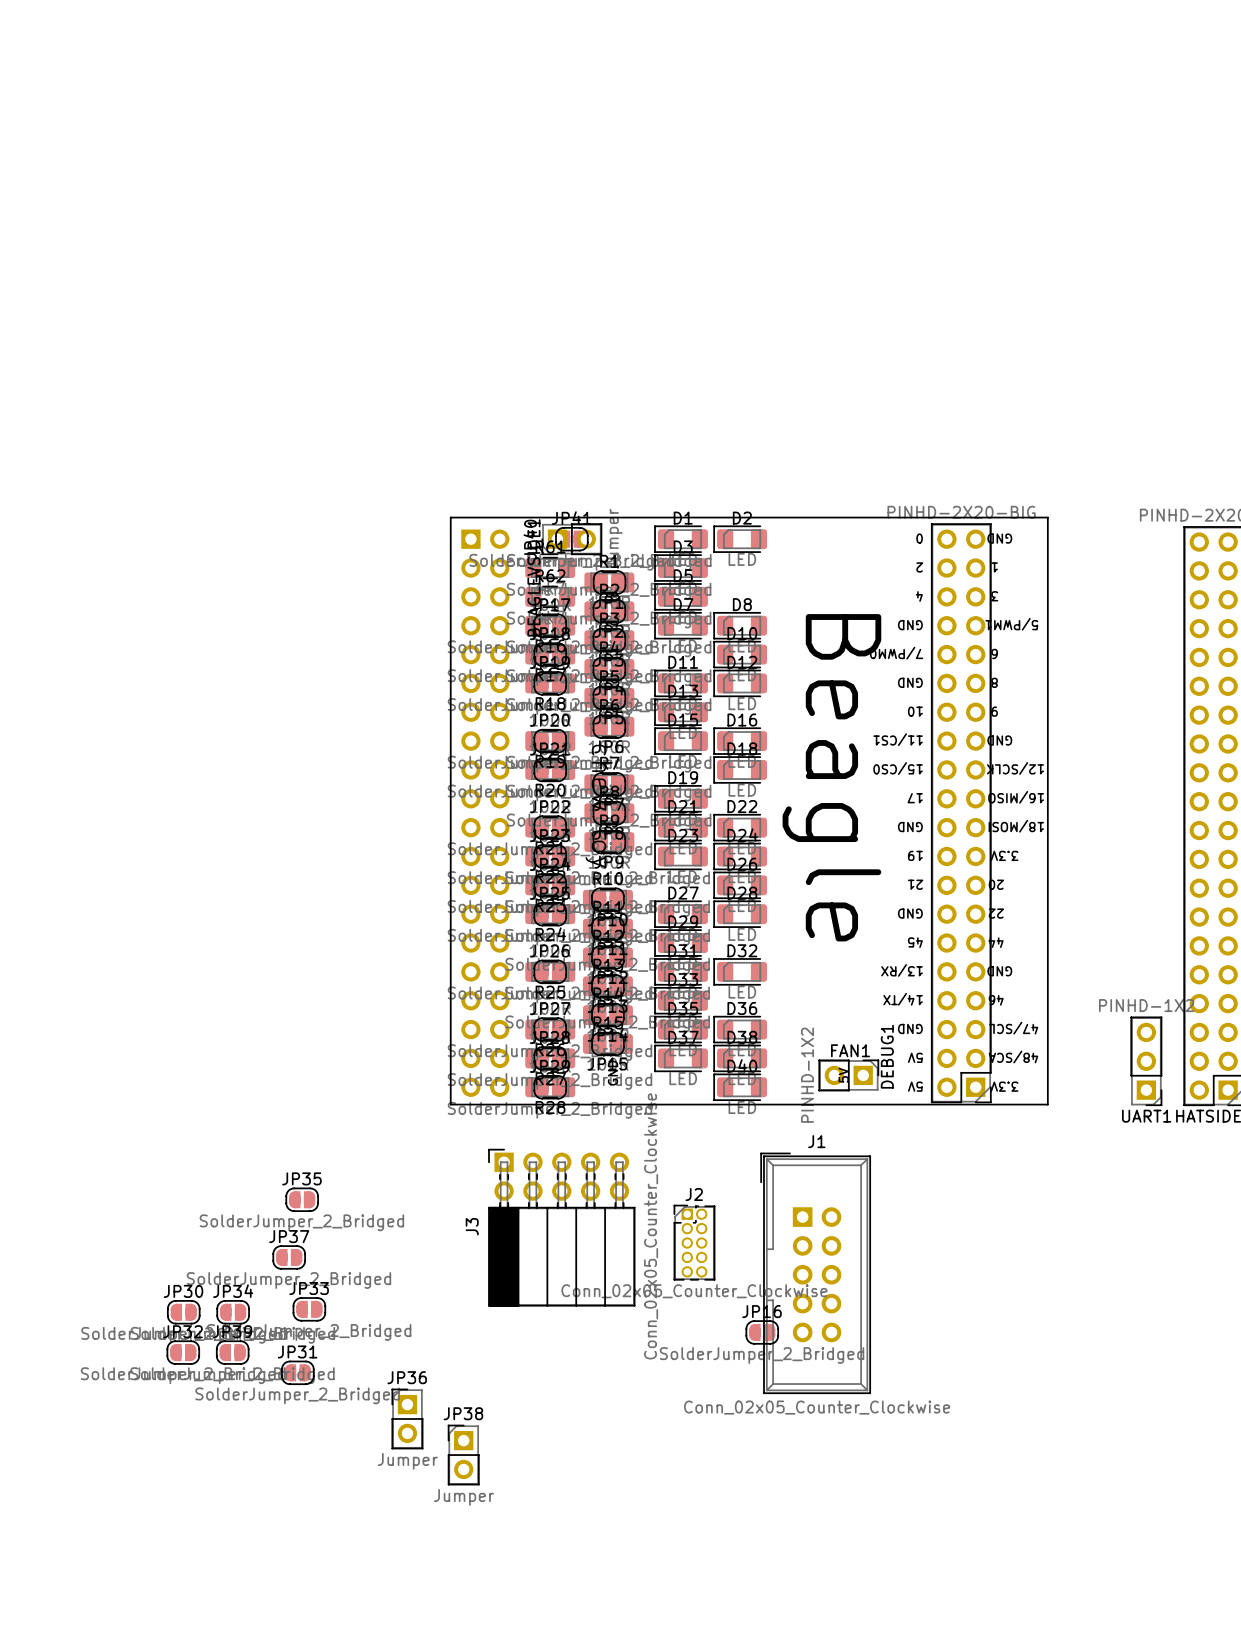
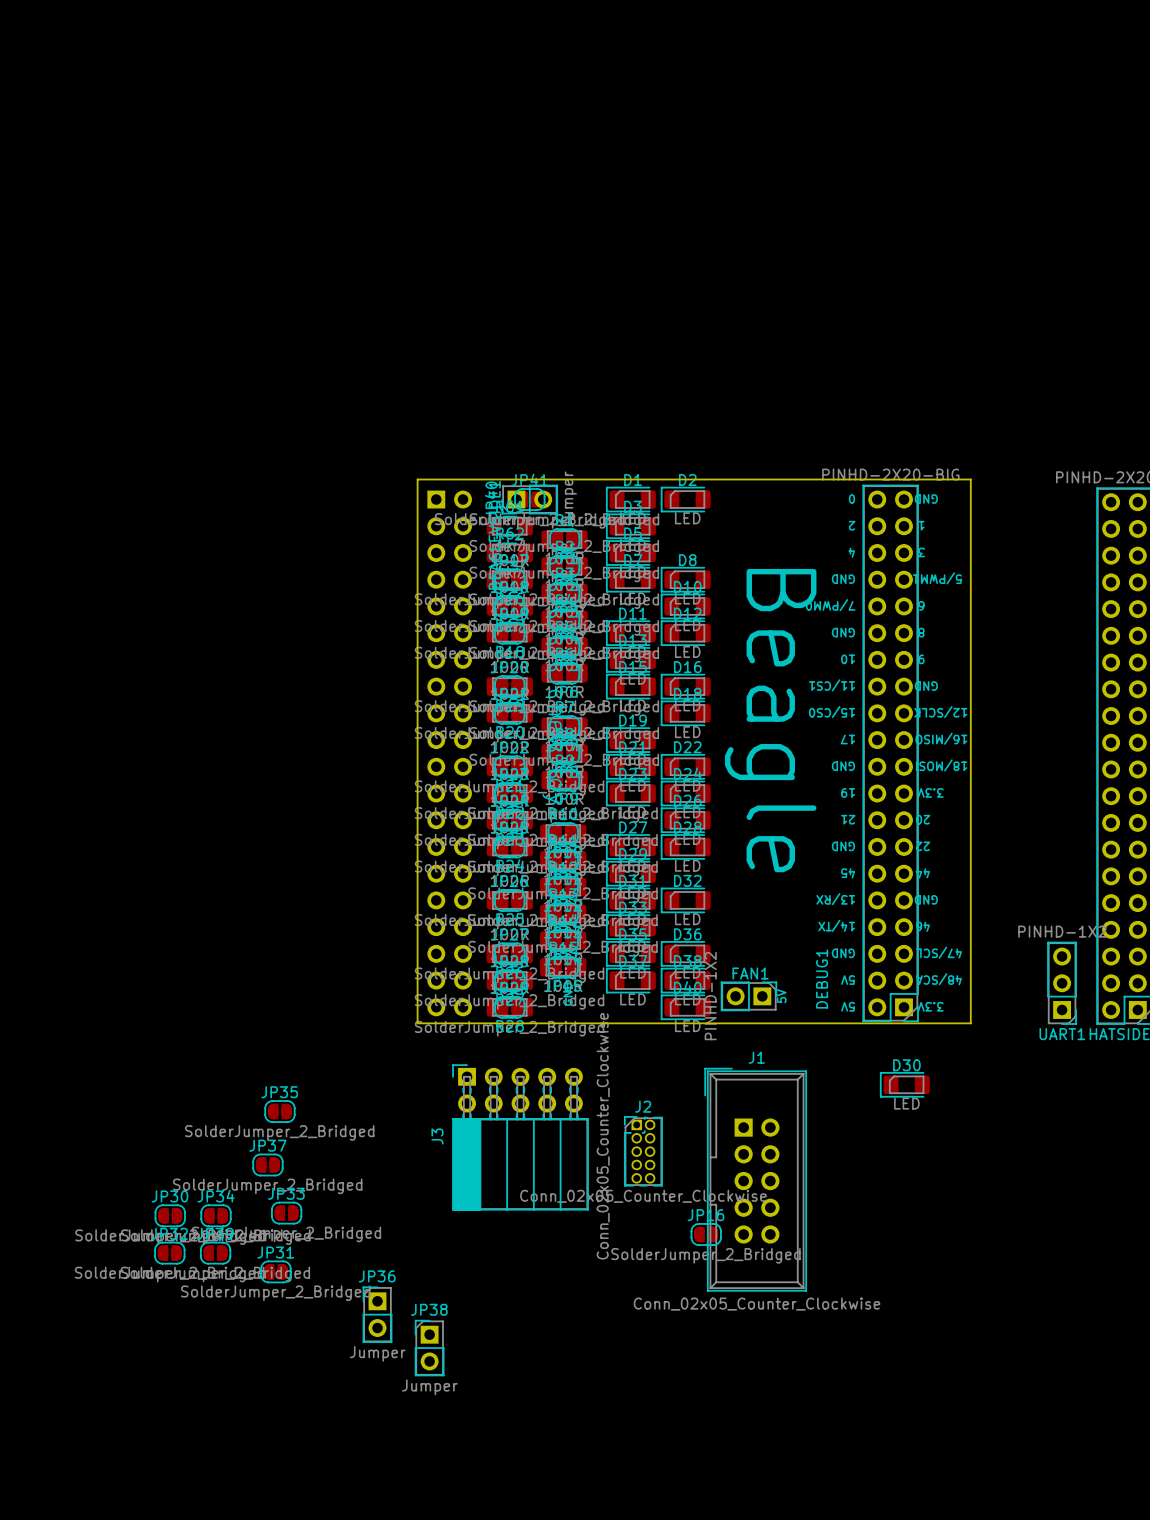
FAN1 position: (848, 1075) -> (748, 996)
D30: none -> LED (904, 1084)

